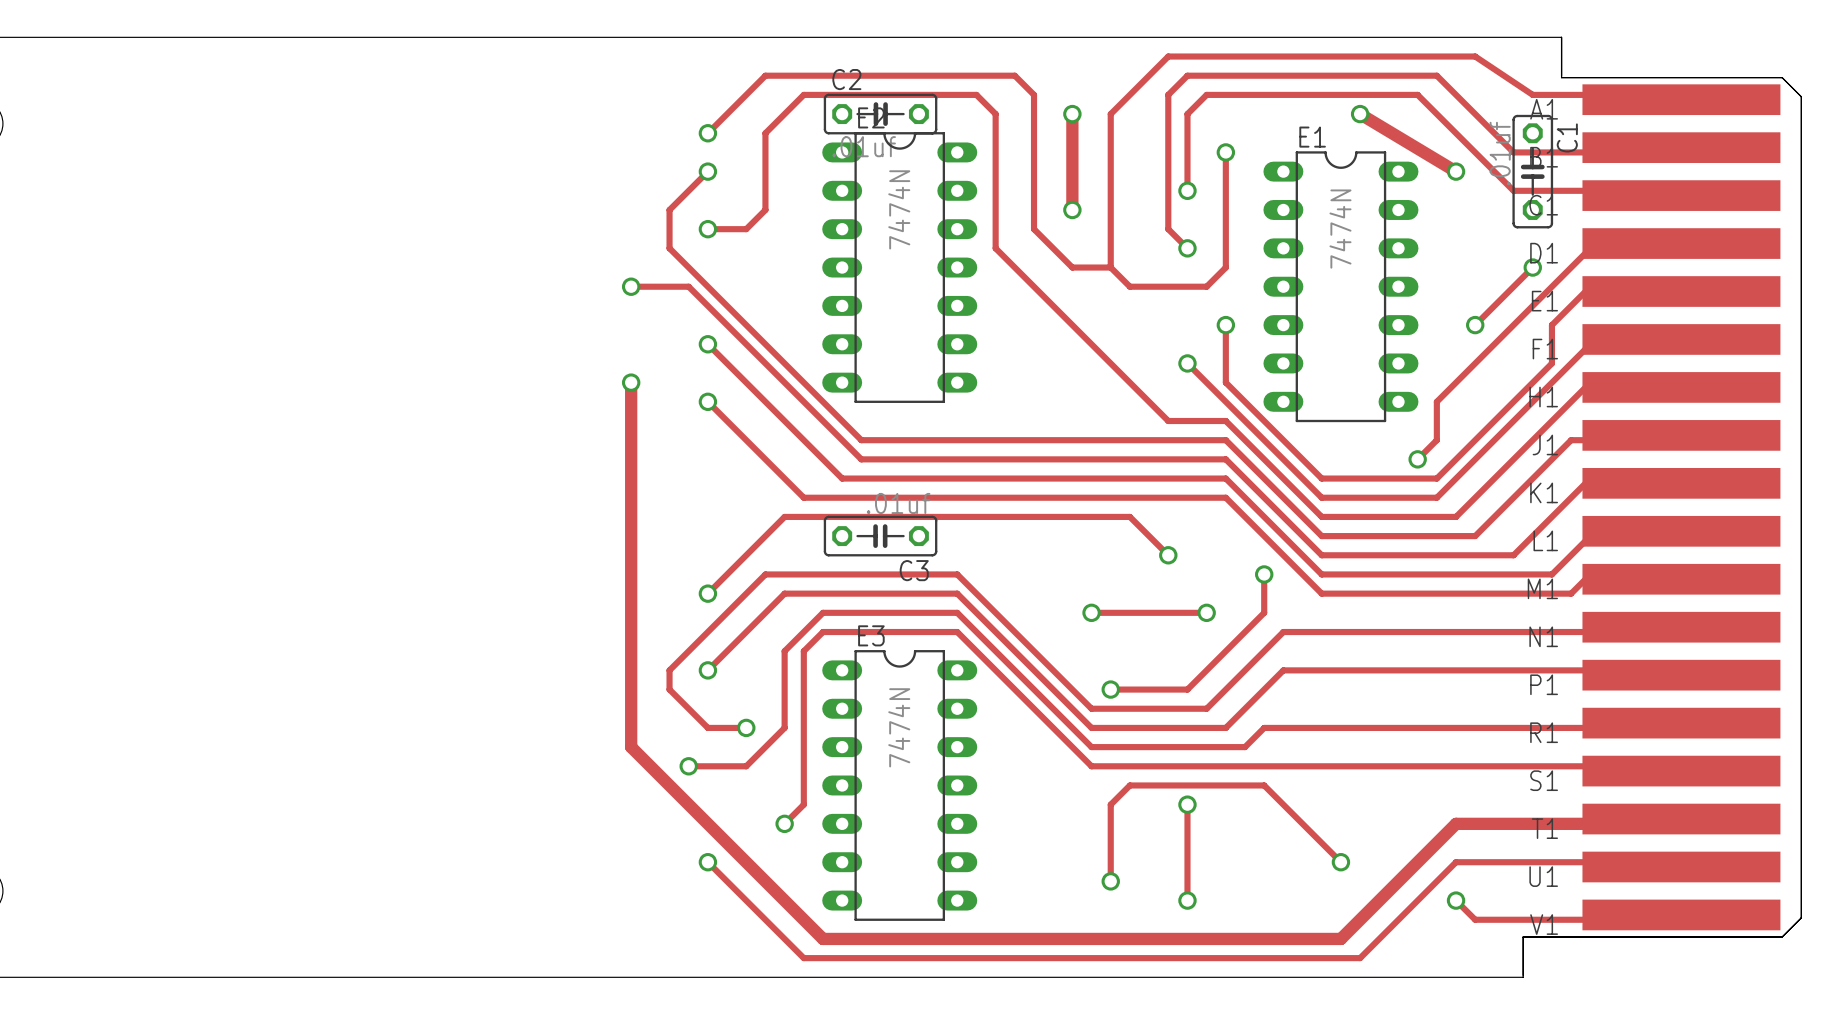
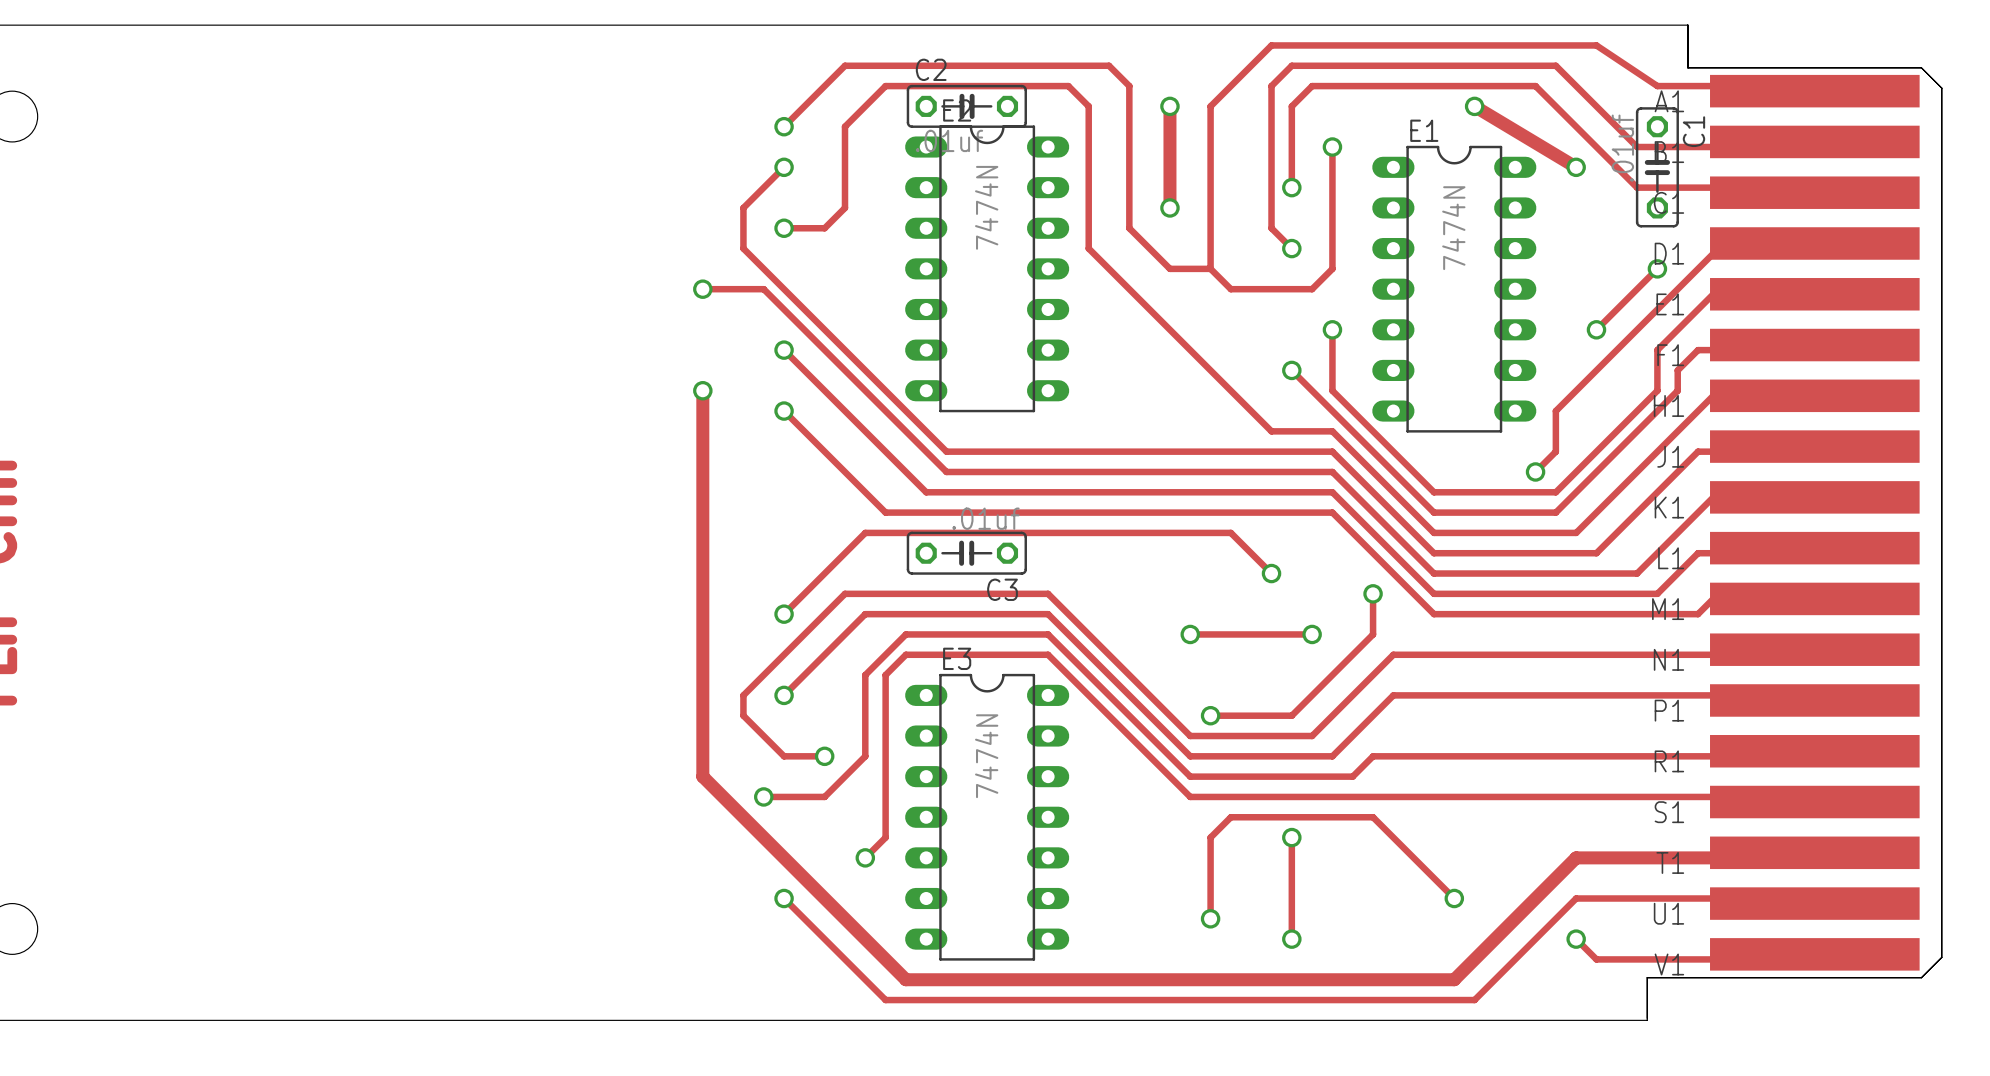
track: (1551, 325) (1551, 363) (1532, 382) -> (1677, 329) (1657, 350) (1657, 390)
track: (1590, 344) (1551, 382) -> (1718, 350) (1698, 350) (1677, 370) (1677, 390)
track: (1590, 536) (1551, 574) (1532, 574) -> (1718, 553) (1698, 553) (1657, 593)

